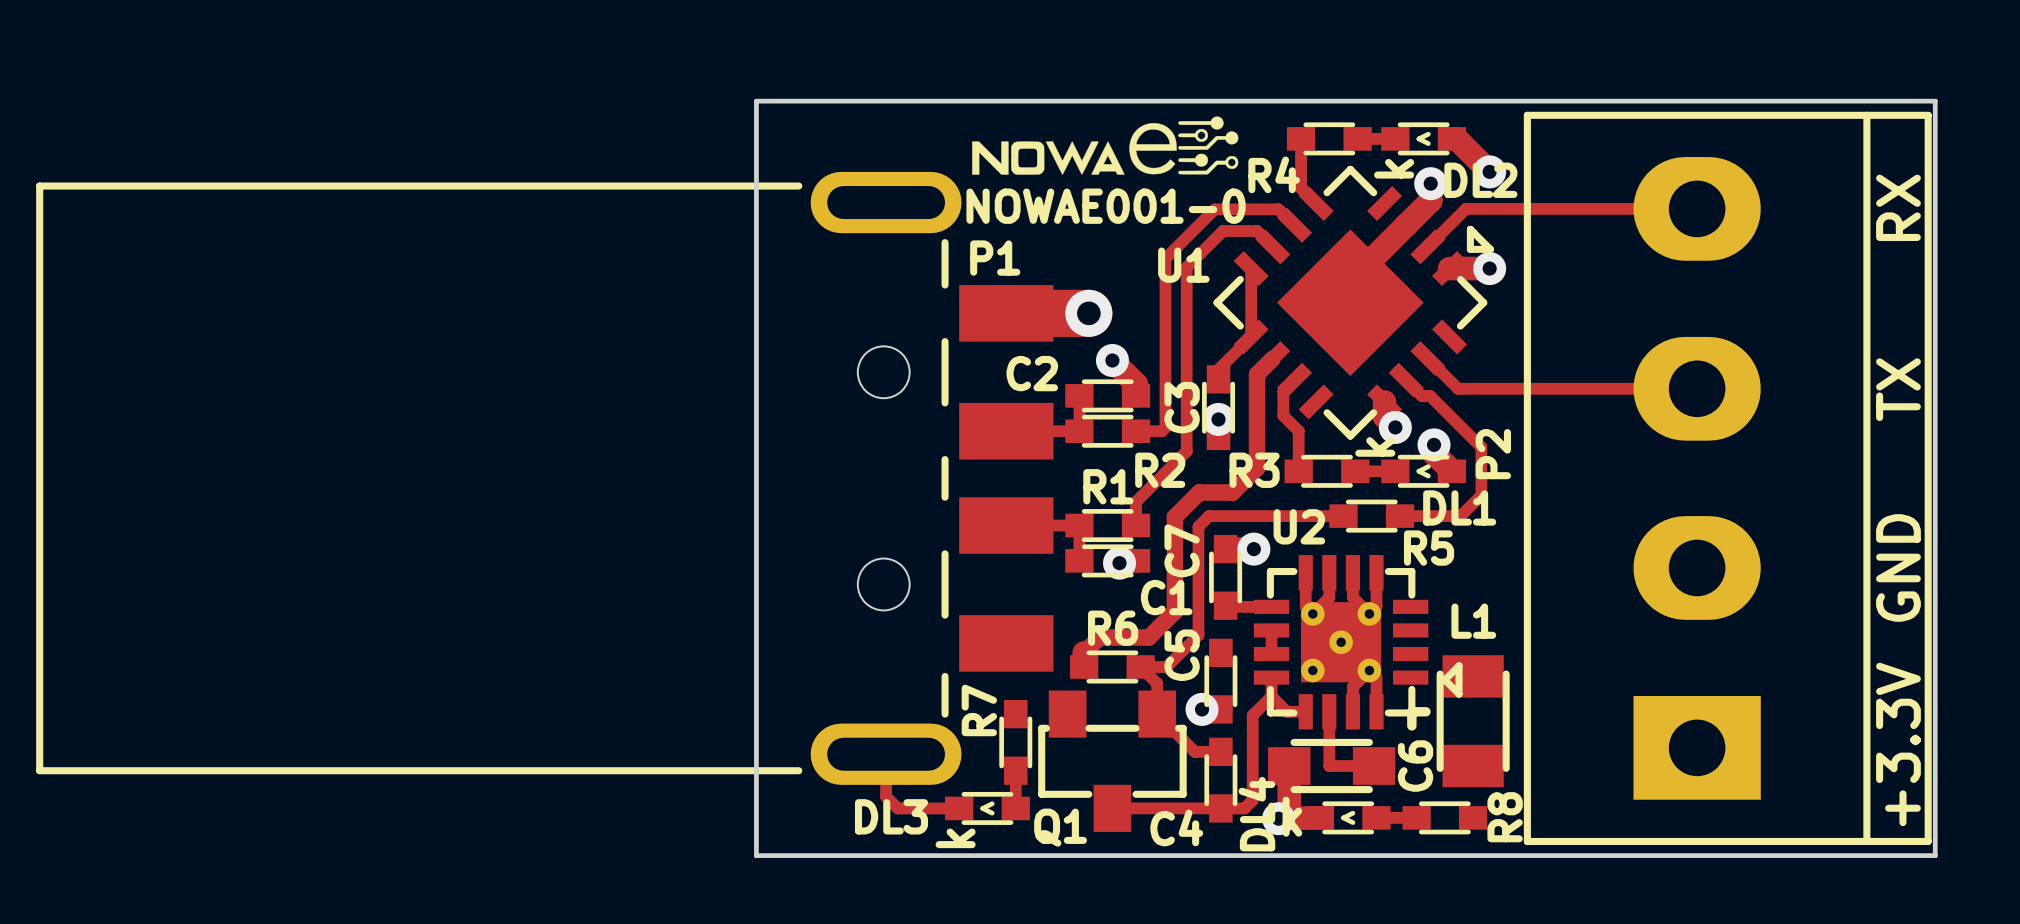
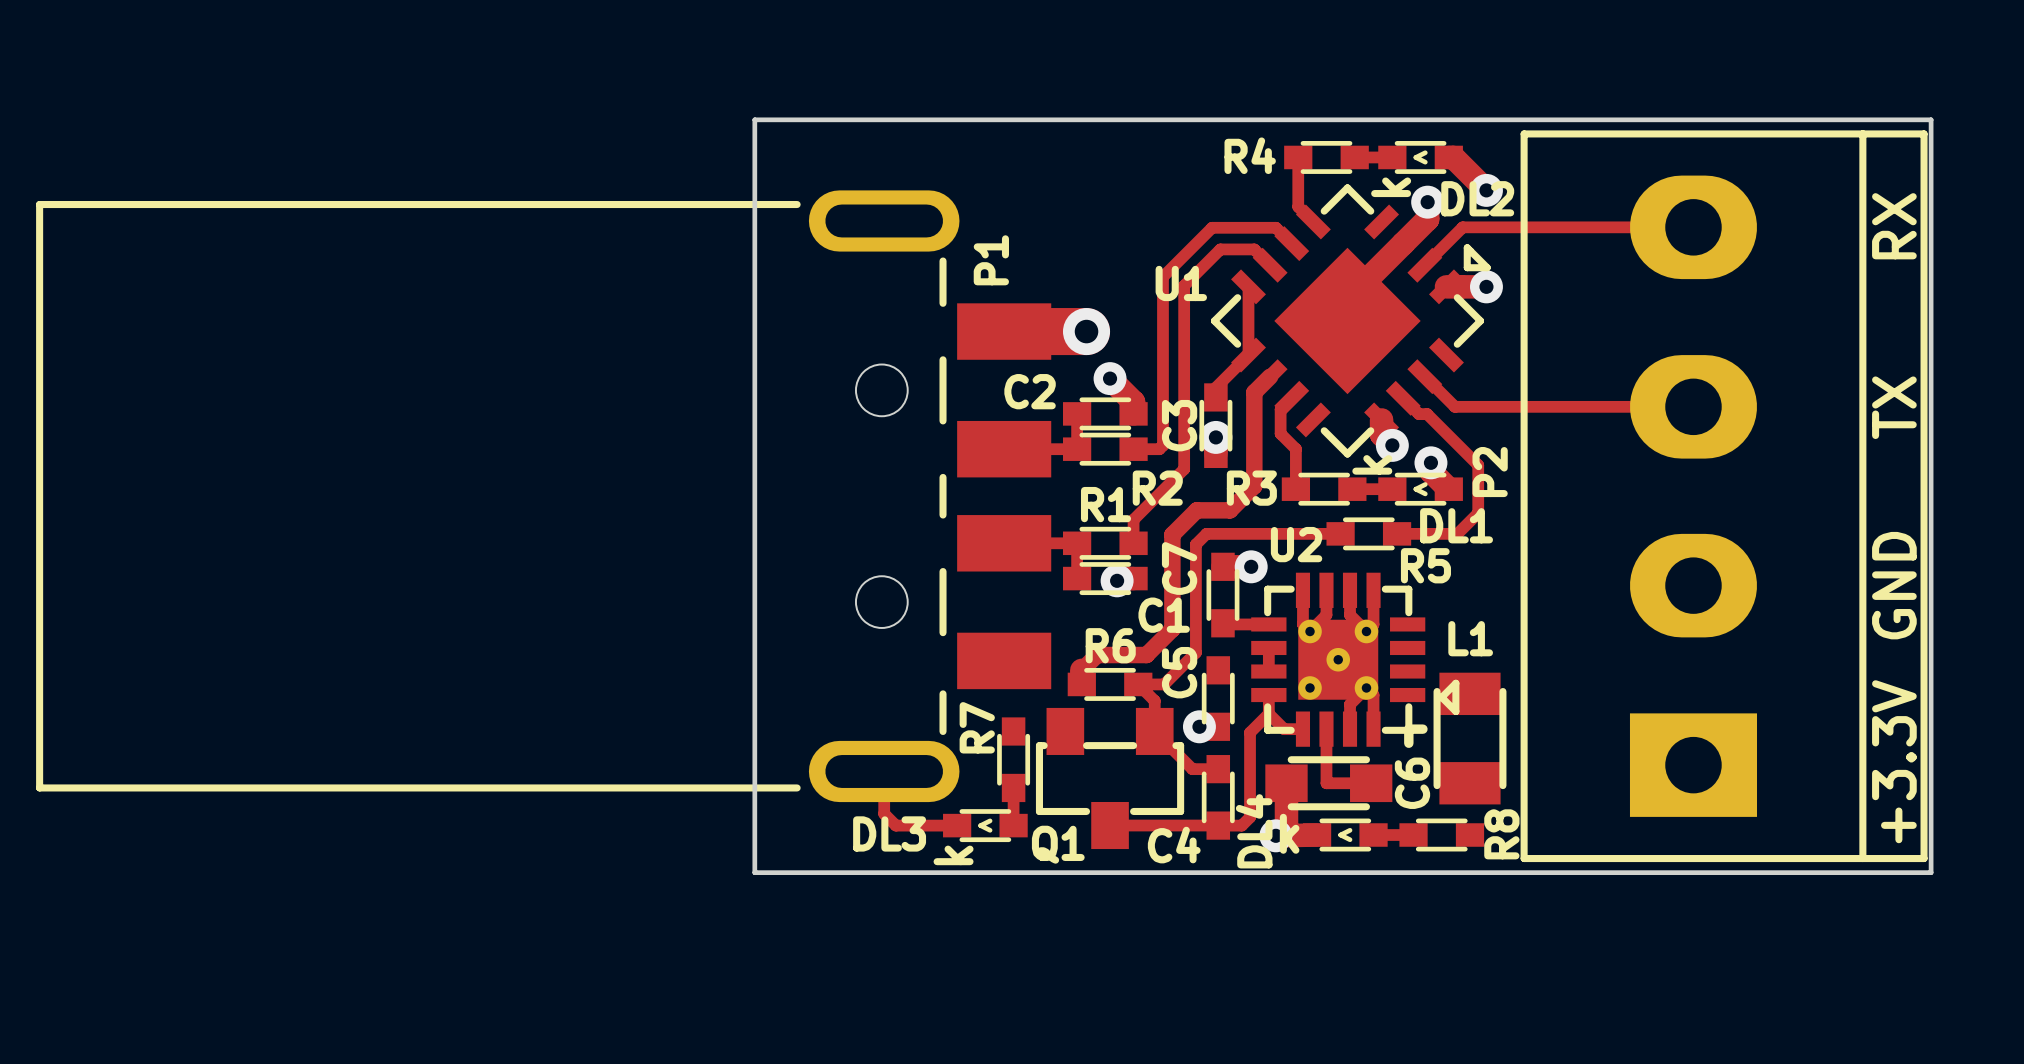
drawing: [972, 116, 1239, 175] -> none
R4 name position: R4 (1274, 174) -> R4 (1250, 155)
text: NOWAE001-0 (1106, 206) -> none
P1 name rotation: 0° (995, 258) -> 90° counterclockwise (991, 260)

